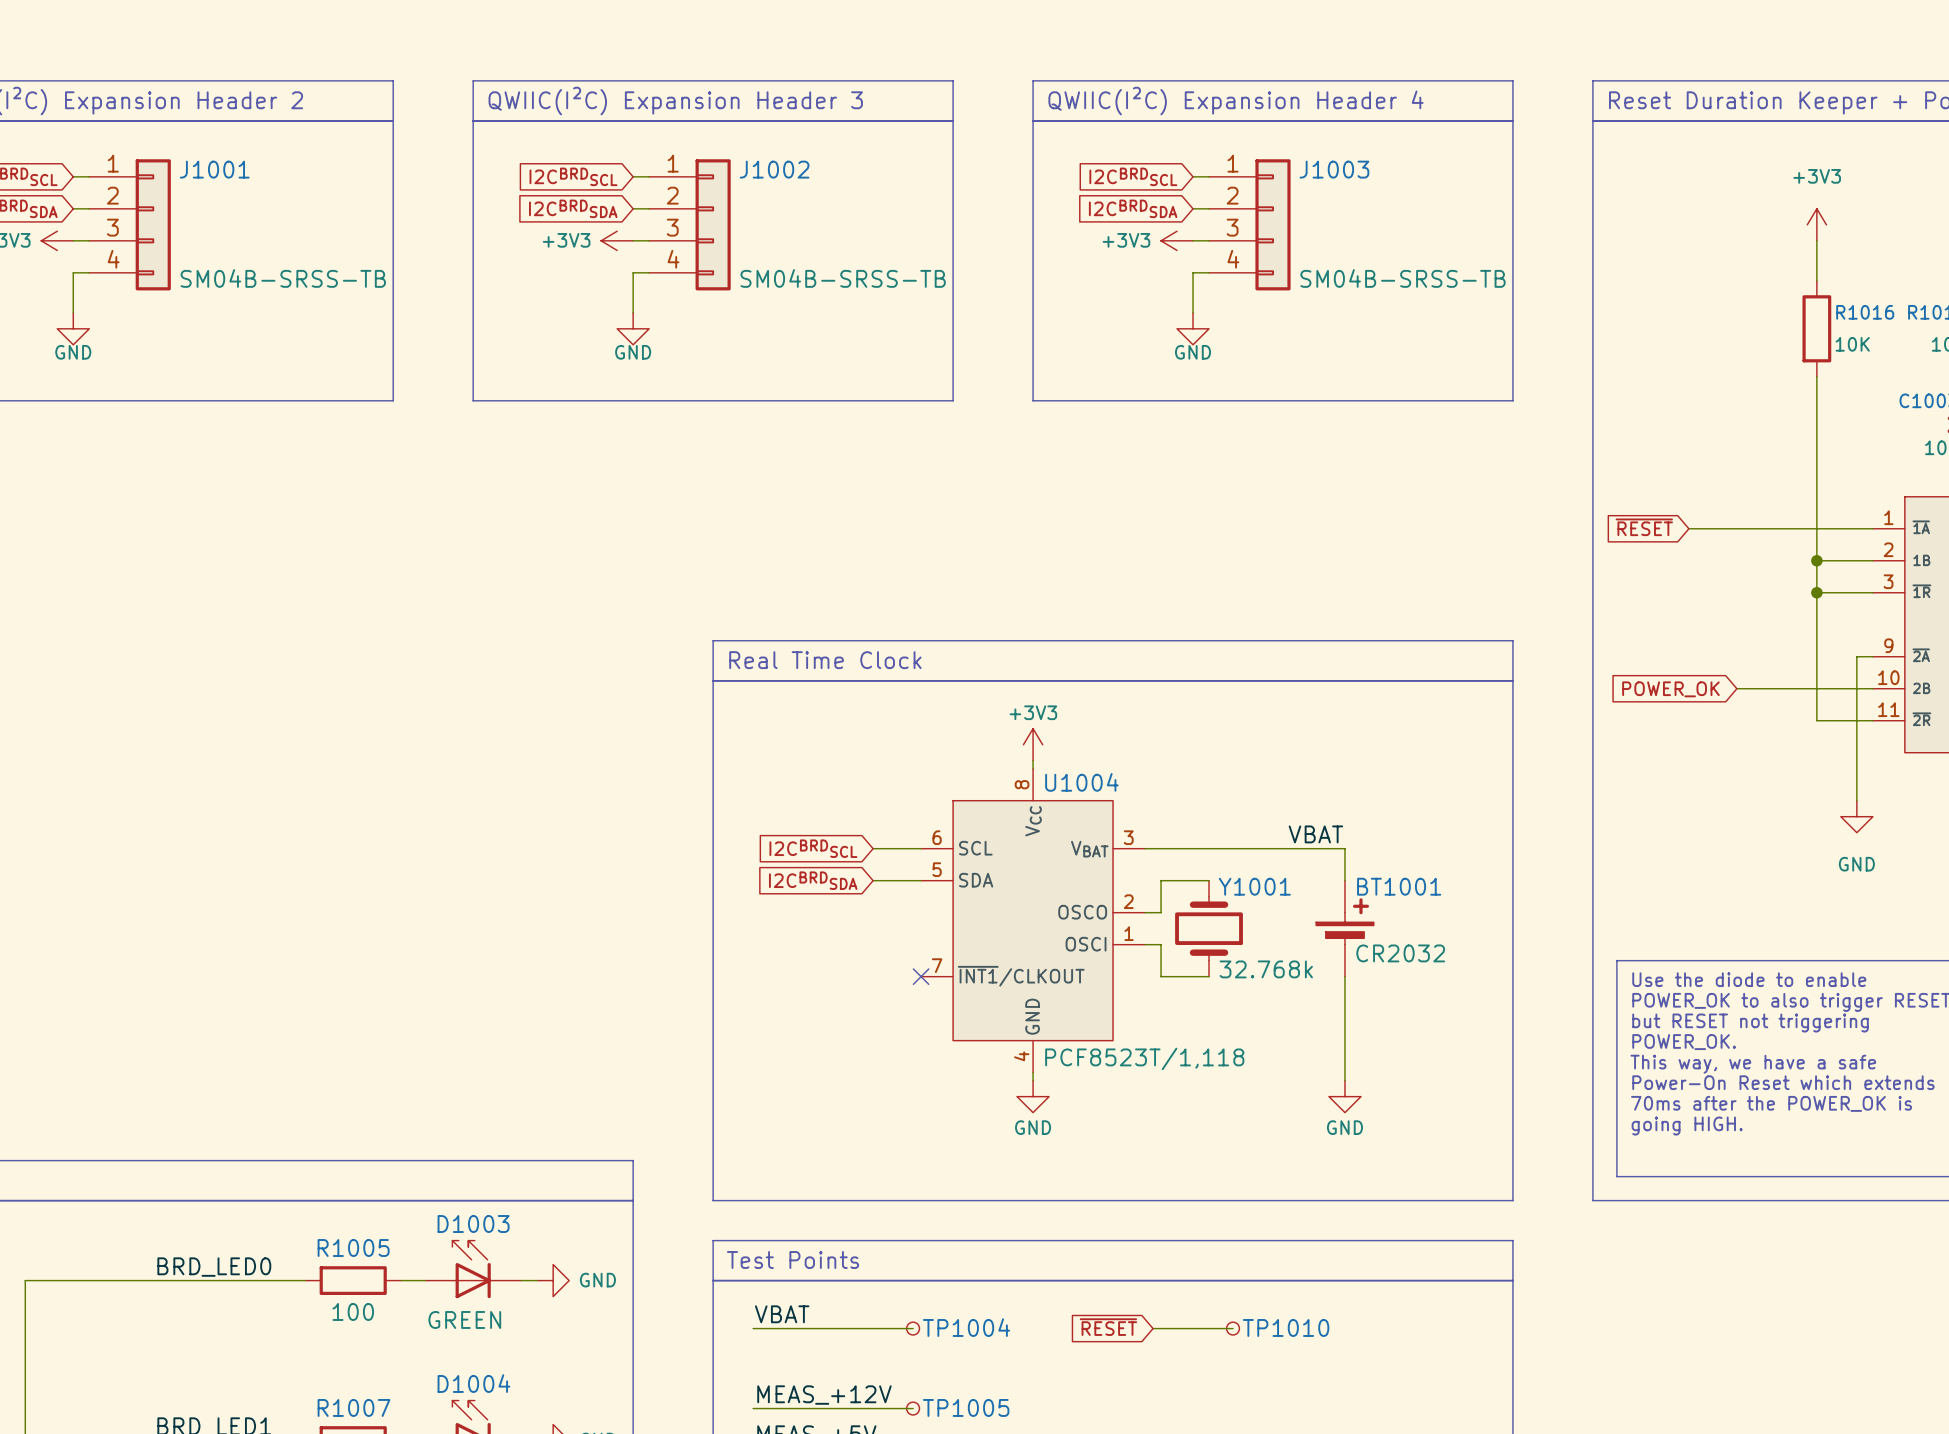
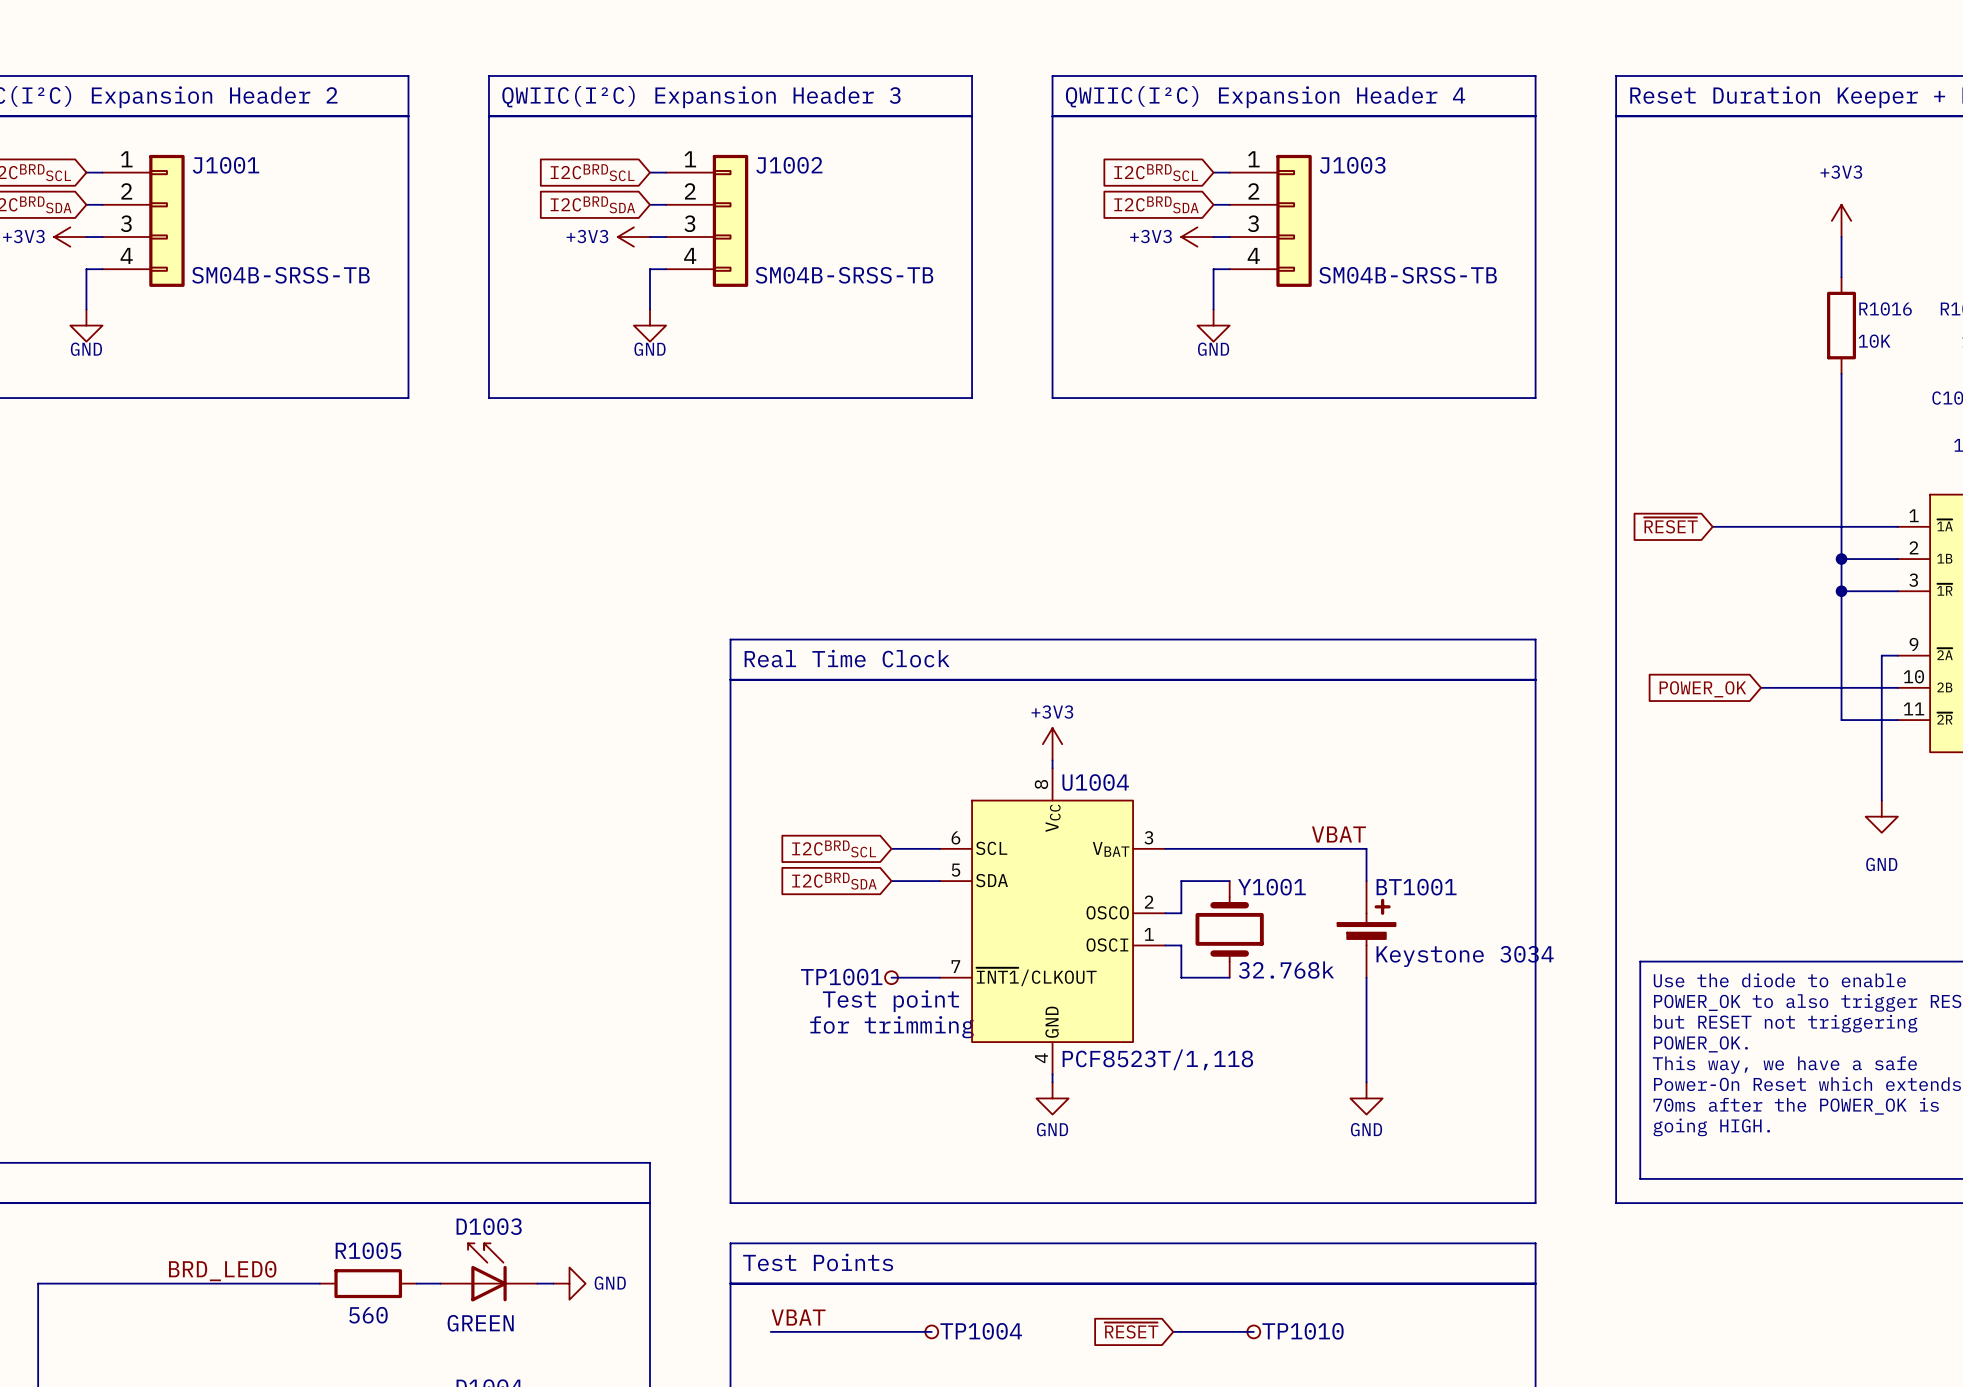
BT1001 value: CR2032 (1400, 953) -> Keystone 3034 (1465, 956)
wire: none -> (891, 977) (939, 977)
TP1001: none -> (891, 977)
no-connect mark: (921, 976) -> none
text: none -> Test point (890, 1001)
text: none -> for trimming (891, 1027)
R1005 value: 100 (353, 1311) -> 560 (368, 1315)

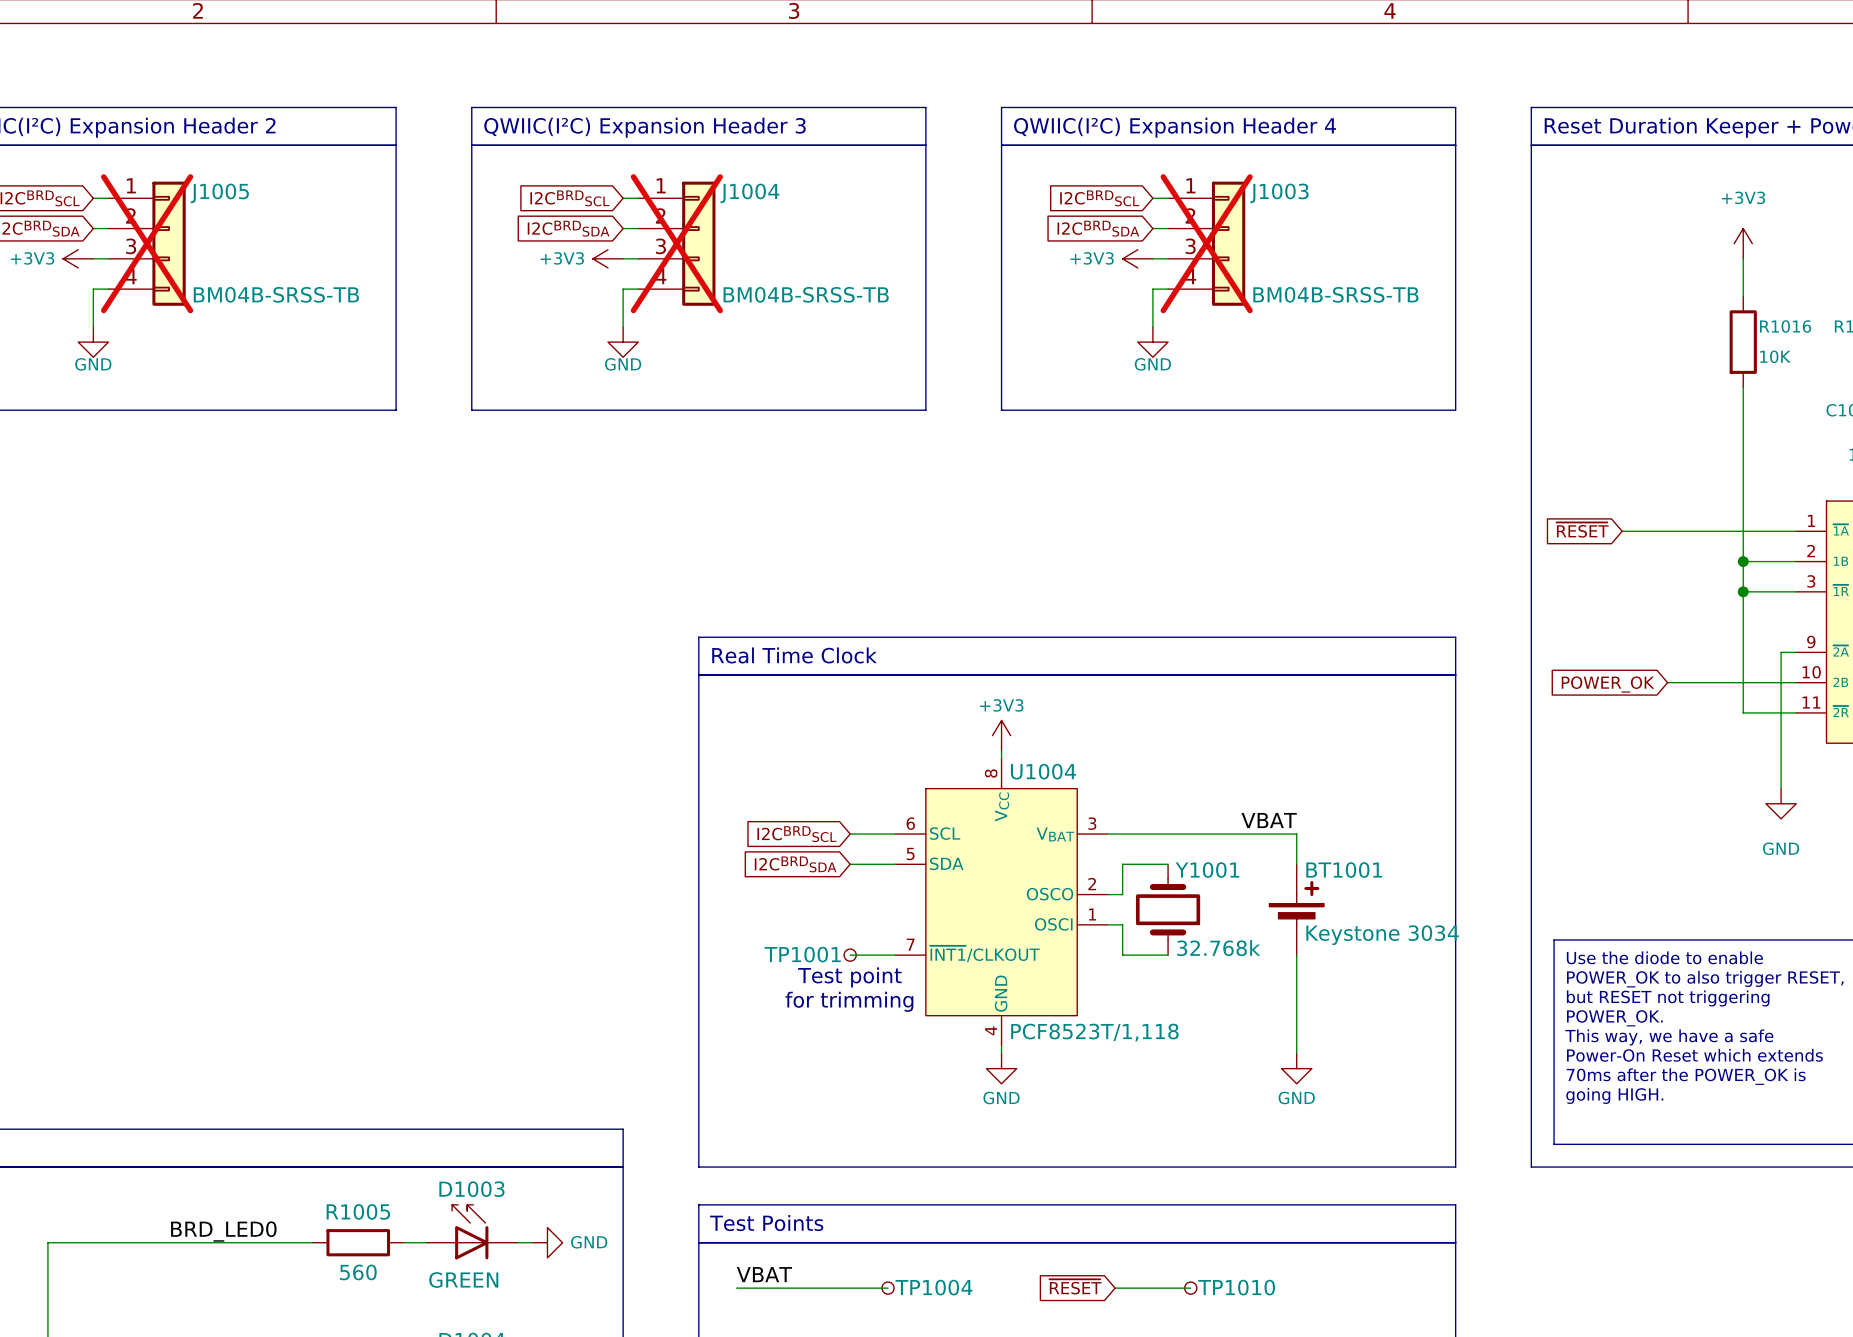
J1001 name: J1001 (226, 165) -> J1005 (219, 193)
J1002 name: J1002 (789, 165) -> J1004 (749, 193)
J1001 do-not-place cross: none -> (147, 243)
J1002 do-not-place cross: none -> (676, 243)
J1003 do-not-place cross: none -> (1206, 243)
J1001 value: SM04B-SRSS-TB (280, 275) -> BM04B-SRSS-TB (276, 294)
J1002 value: SM04B-SRSS-TB (844, 275) -> BM04B-SRSS-TB (806, 294)
J1003 value: SM04B-SRSS-TB (1408, 275) -> BM04B-SRSS-TB (1335, 294)

